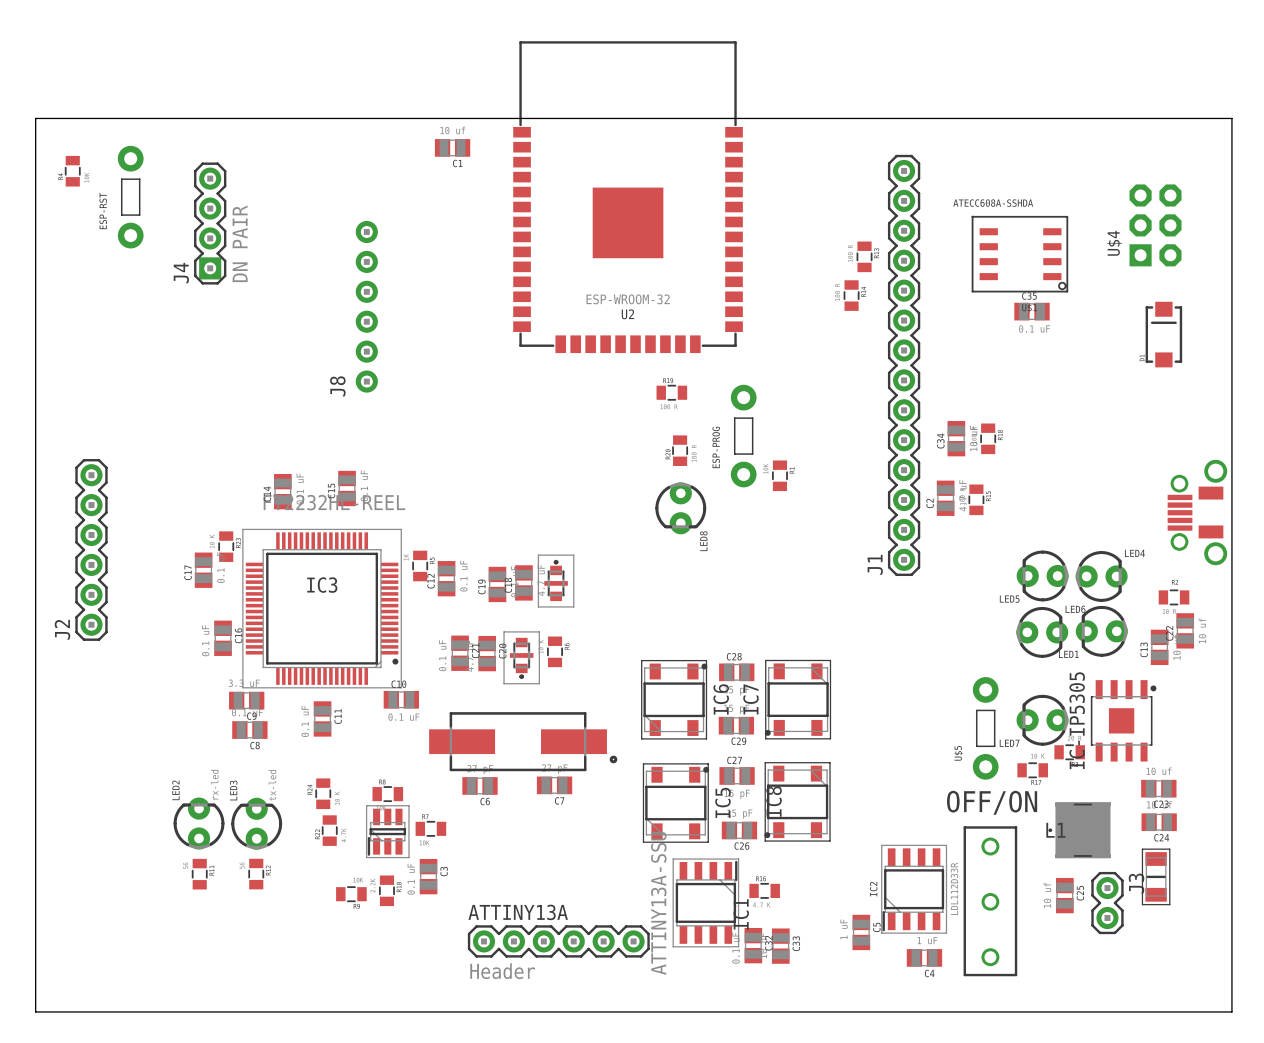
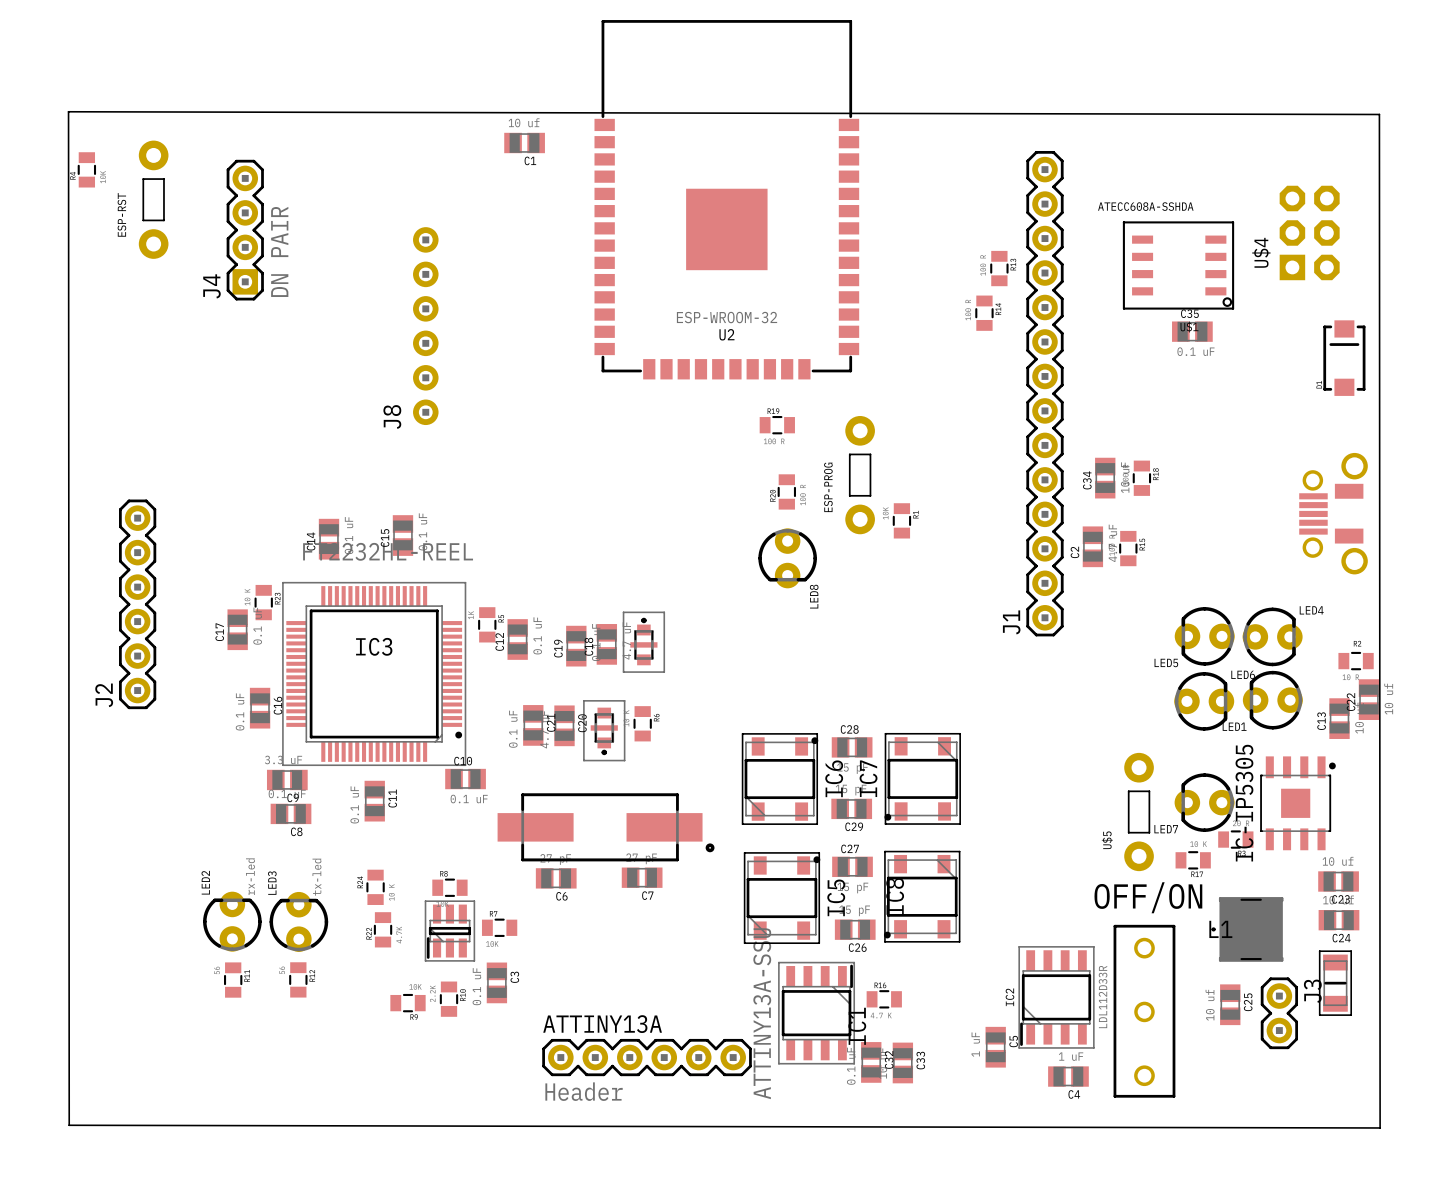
board edge: (35, 118) (1231, 118) (1231, 1011) (35, 1011) (35, 118) -> (68, 111) (69, 1125) (1380, 1127) (1379, 114) (68, 111)
U$4 position: (1155, 225) -> (1309, 232)
part position: (1197, 512) -> (1333, 513)
J2 position: (91, 549) -> (137, 604)

